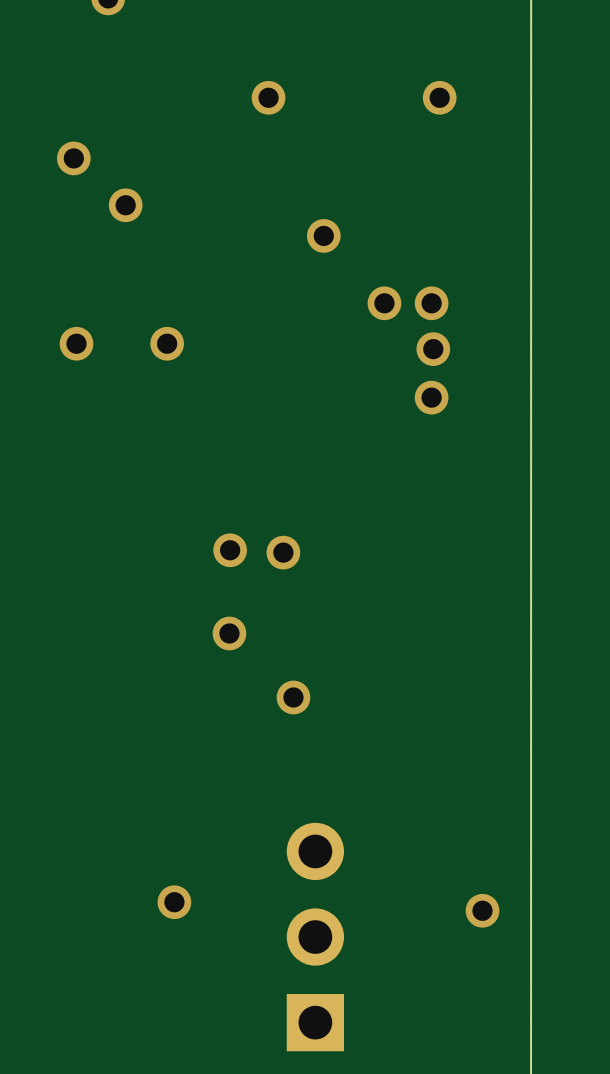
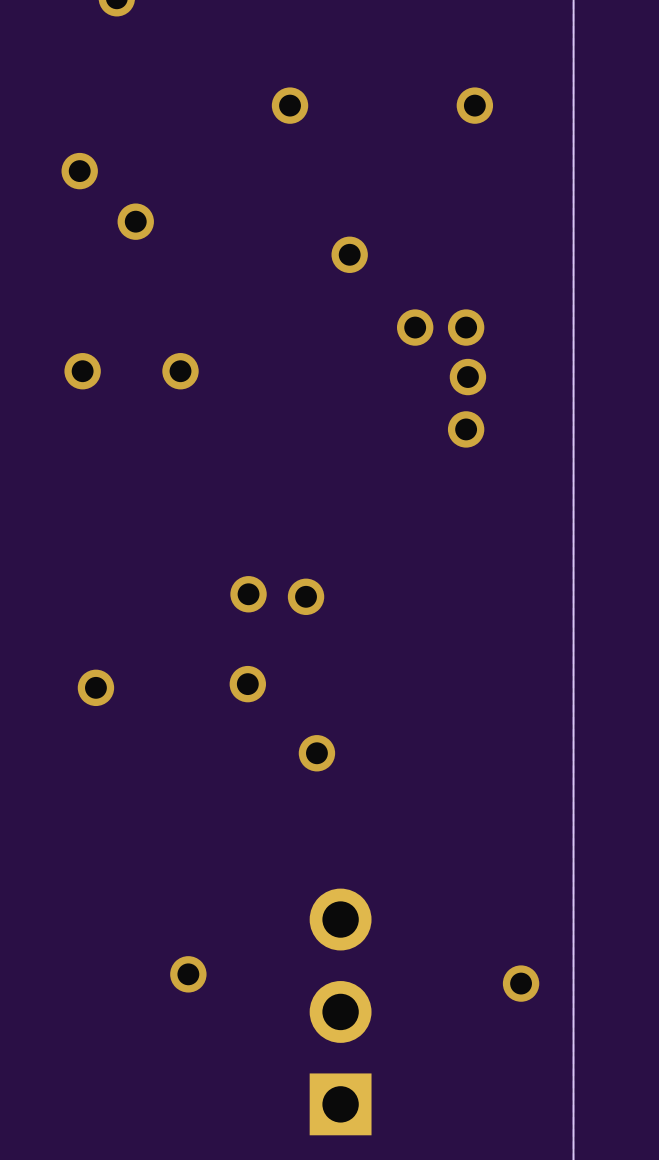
via: none -> (95, 687)

